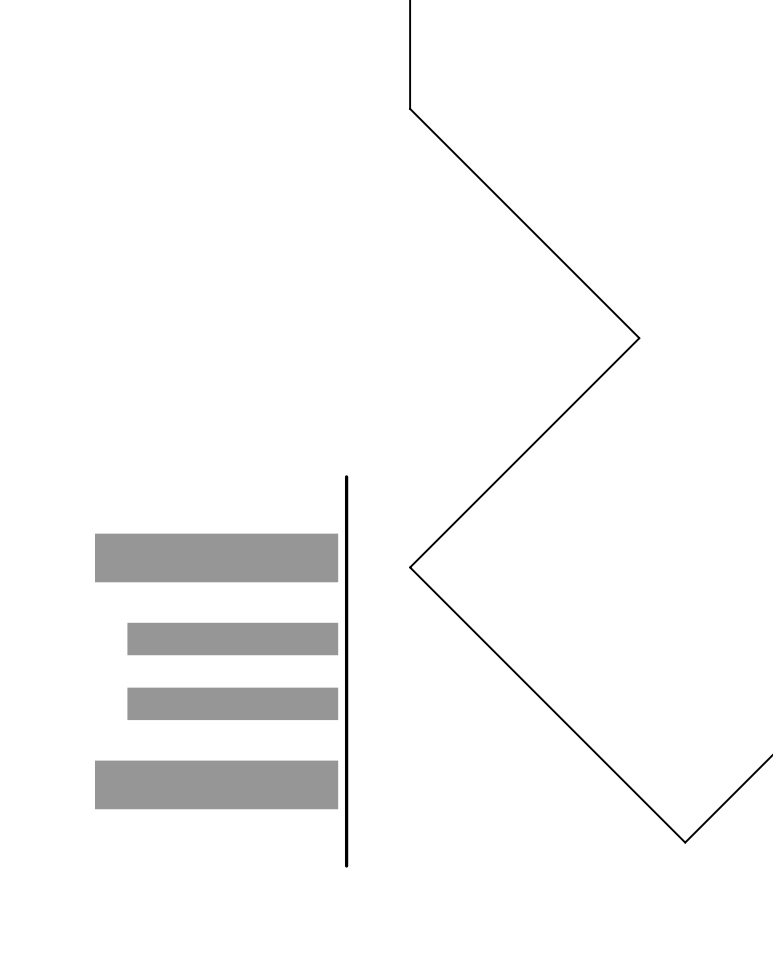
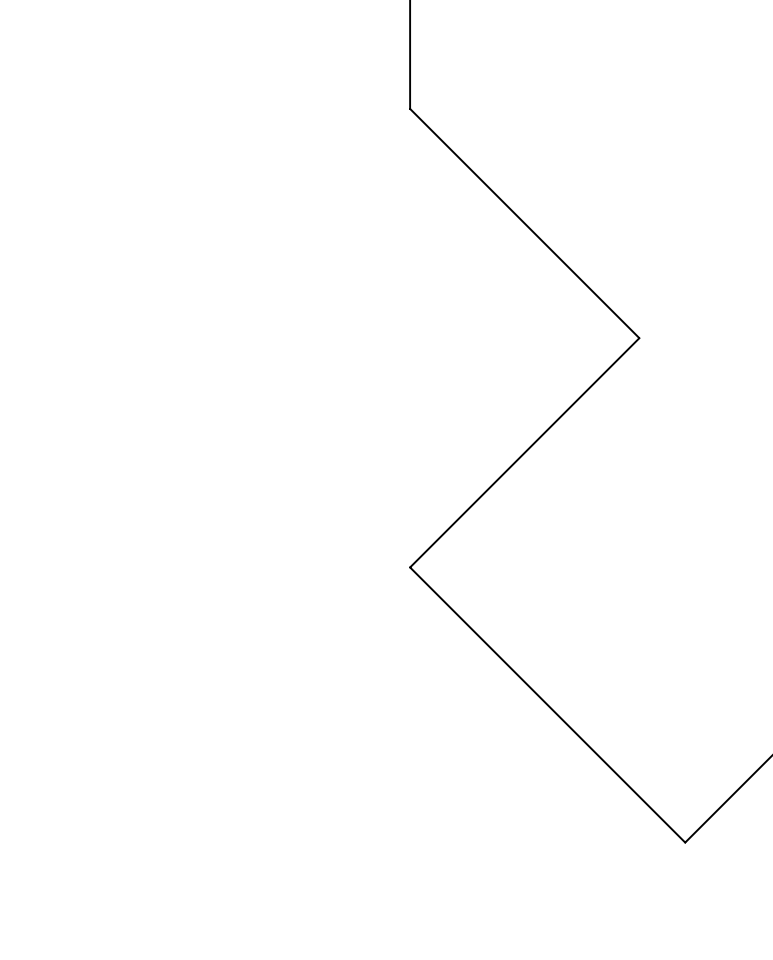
part: (221, 671) -> none

